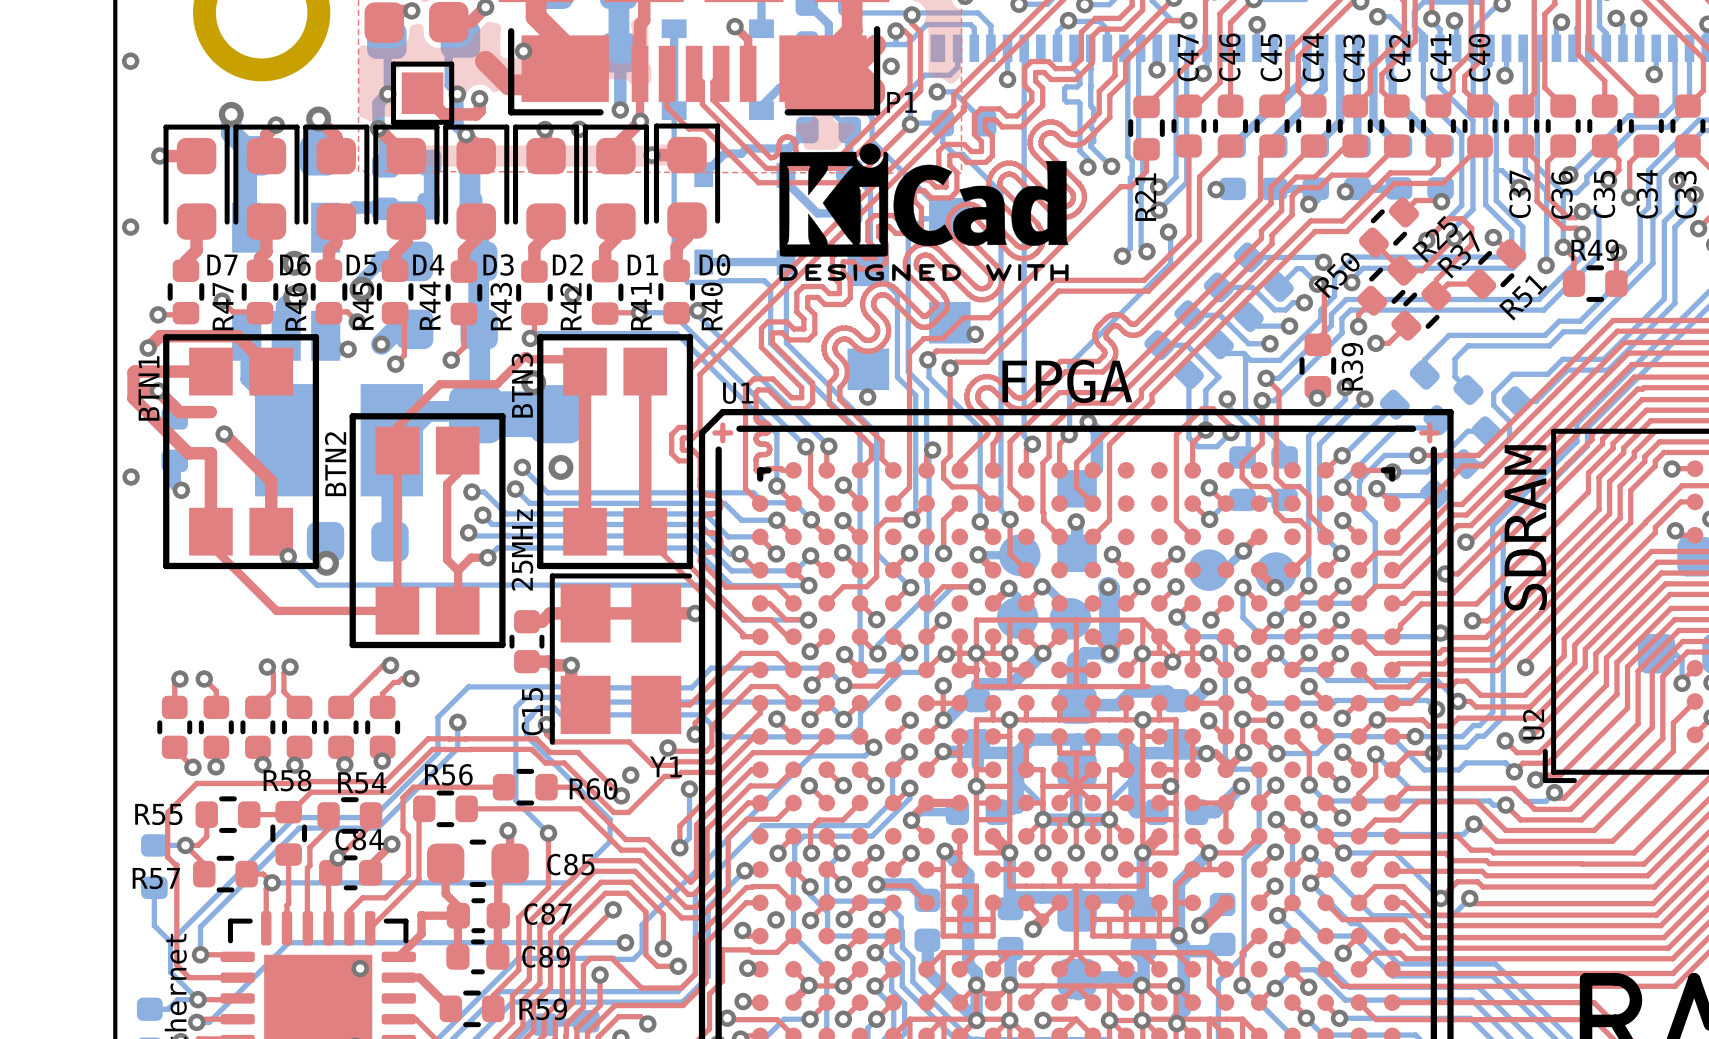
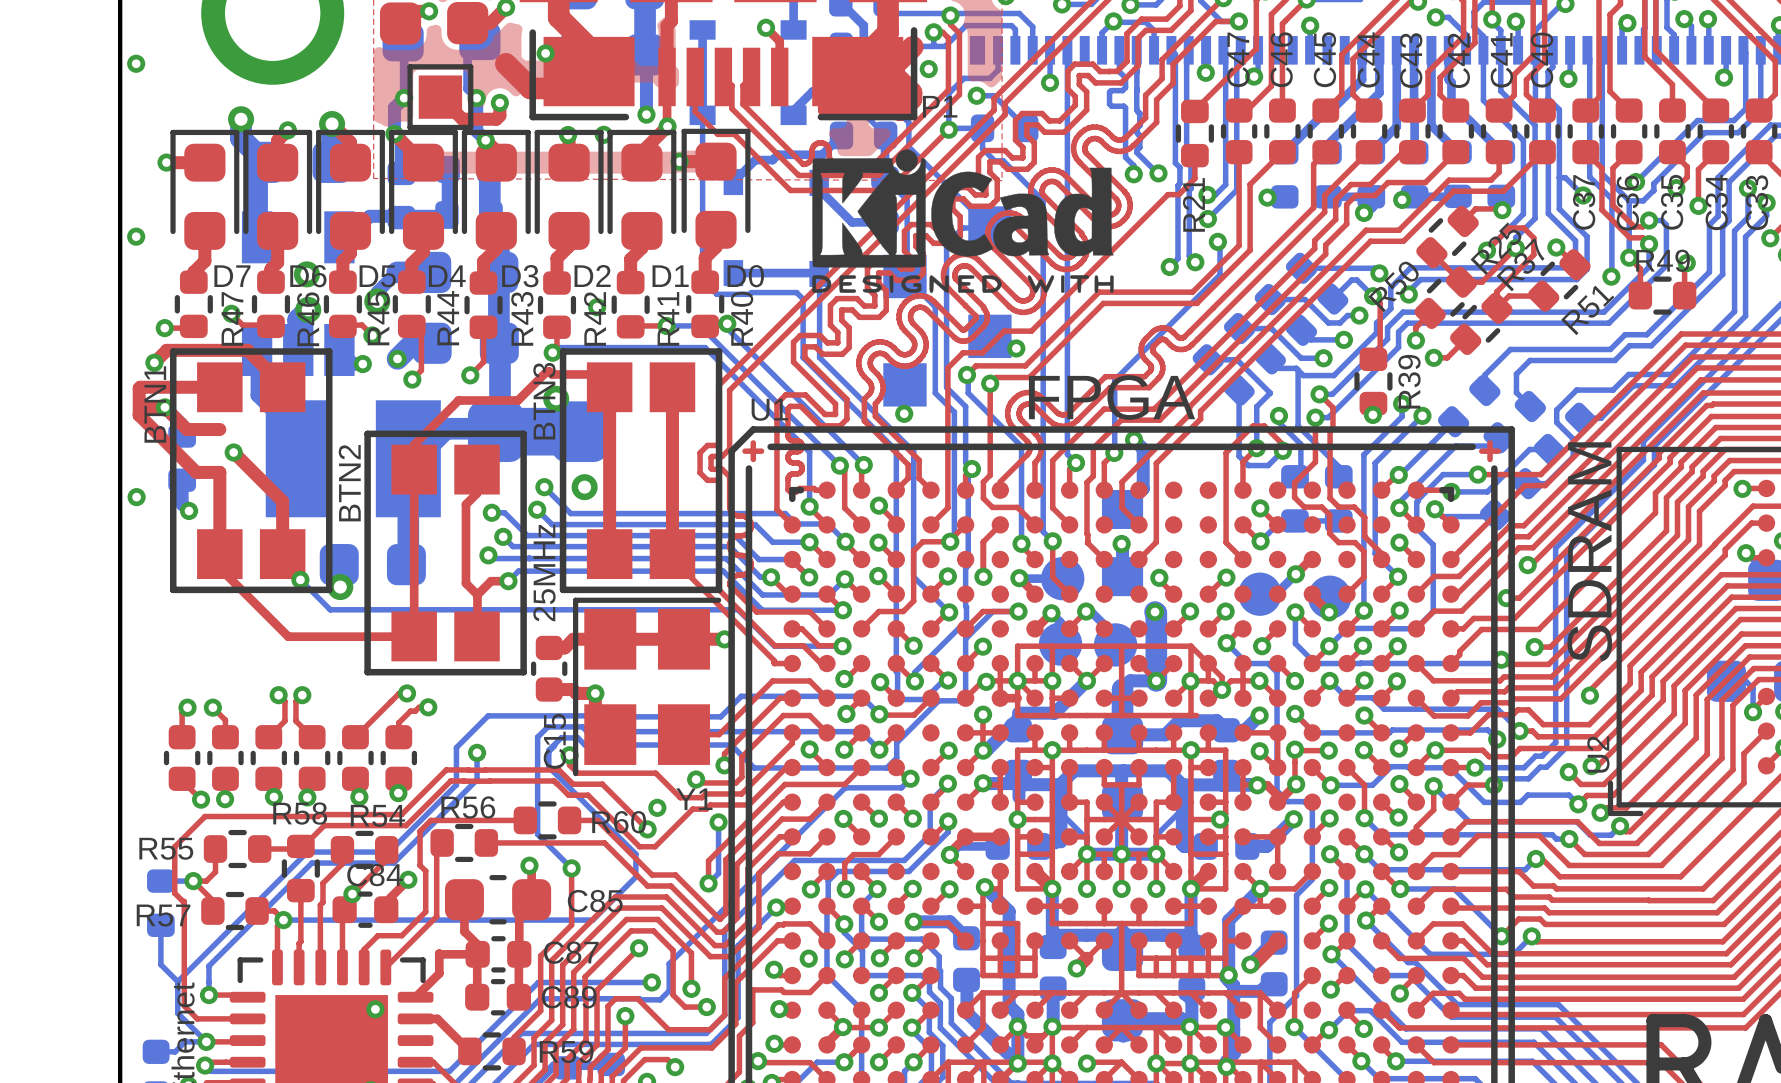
bottom track: (516, 942) (288, 942) (209, 1022) (196, 1022) -> (538, 982) (449, 1071) (210, 1071) (205, 1065)

